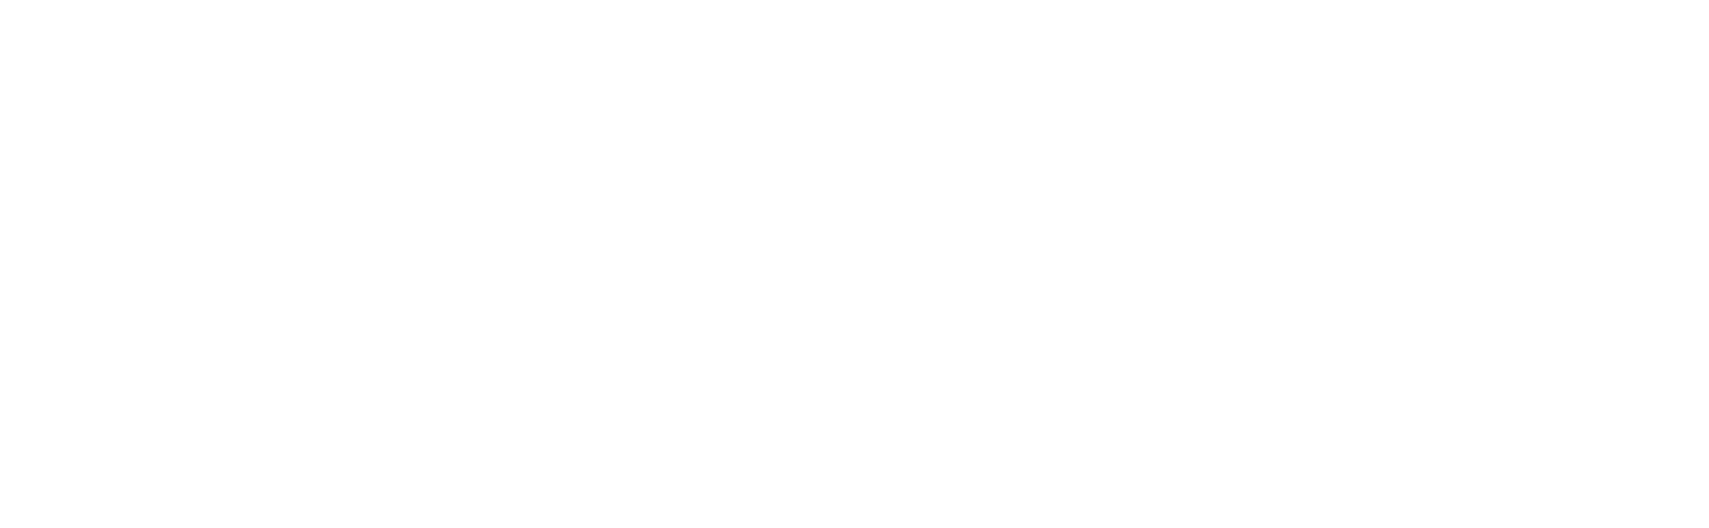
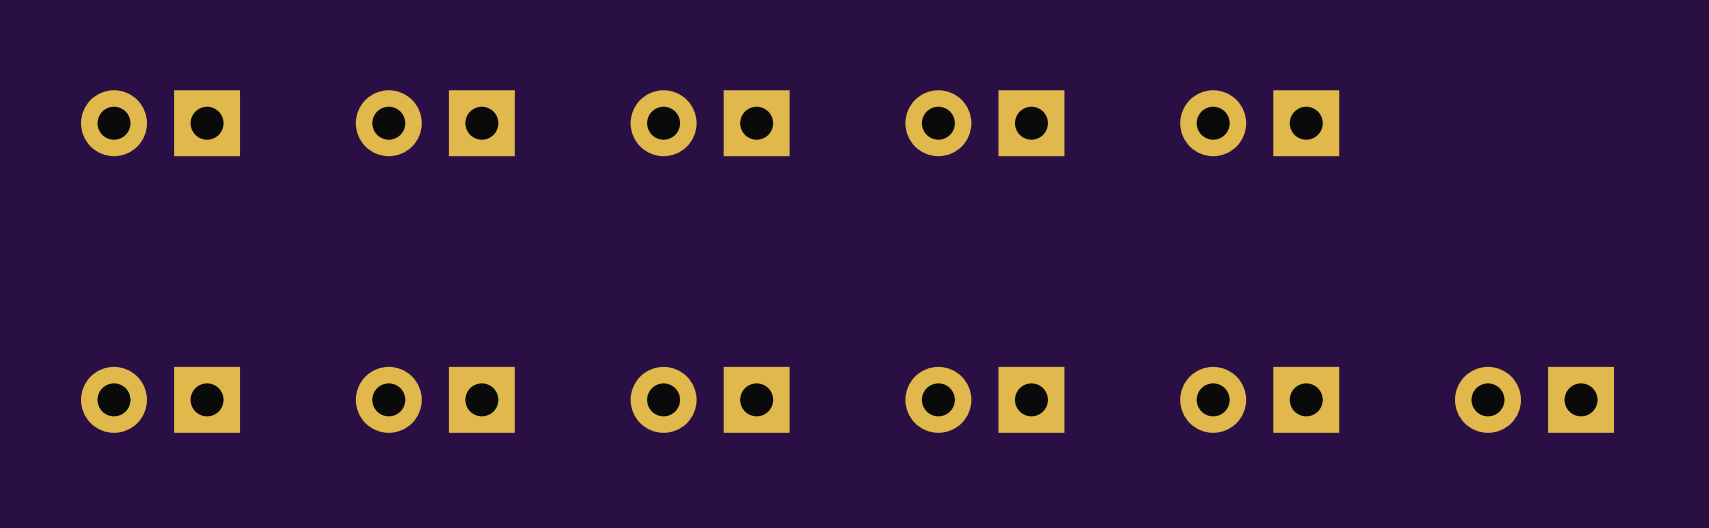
part: none -> (160, 123)
part: none -> (435, 123)
part: none -> (710, 123)
part: none -> (984, 123)
part: none -> (1259, 123)
part: none -> (160, 399)
part: none -> (435, 399)
part: none -> (710, 399)
part: none -> (984, 399)
part: none -> (1259, 399)
part: none -> (1534, 399)

